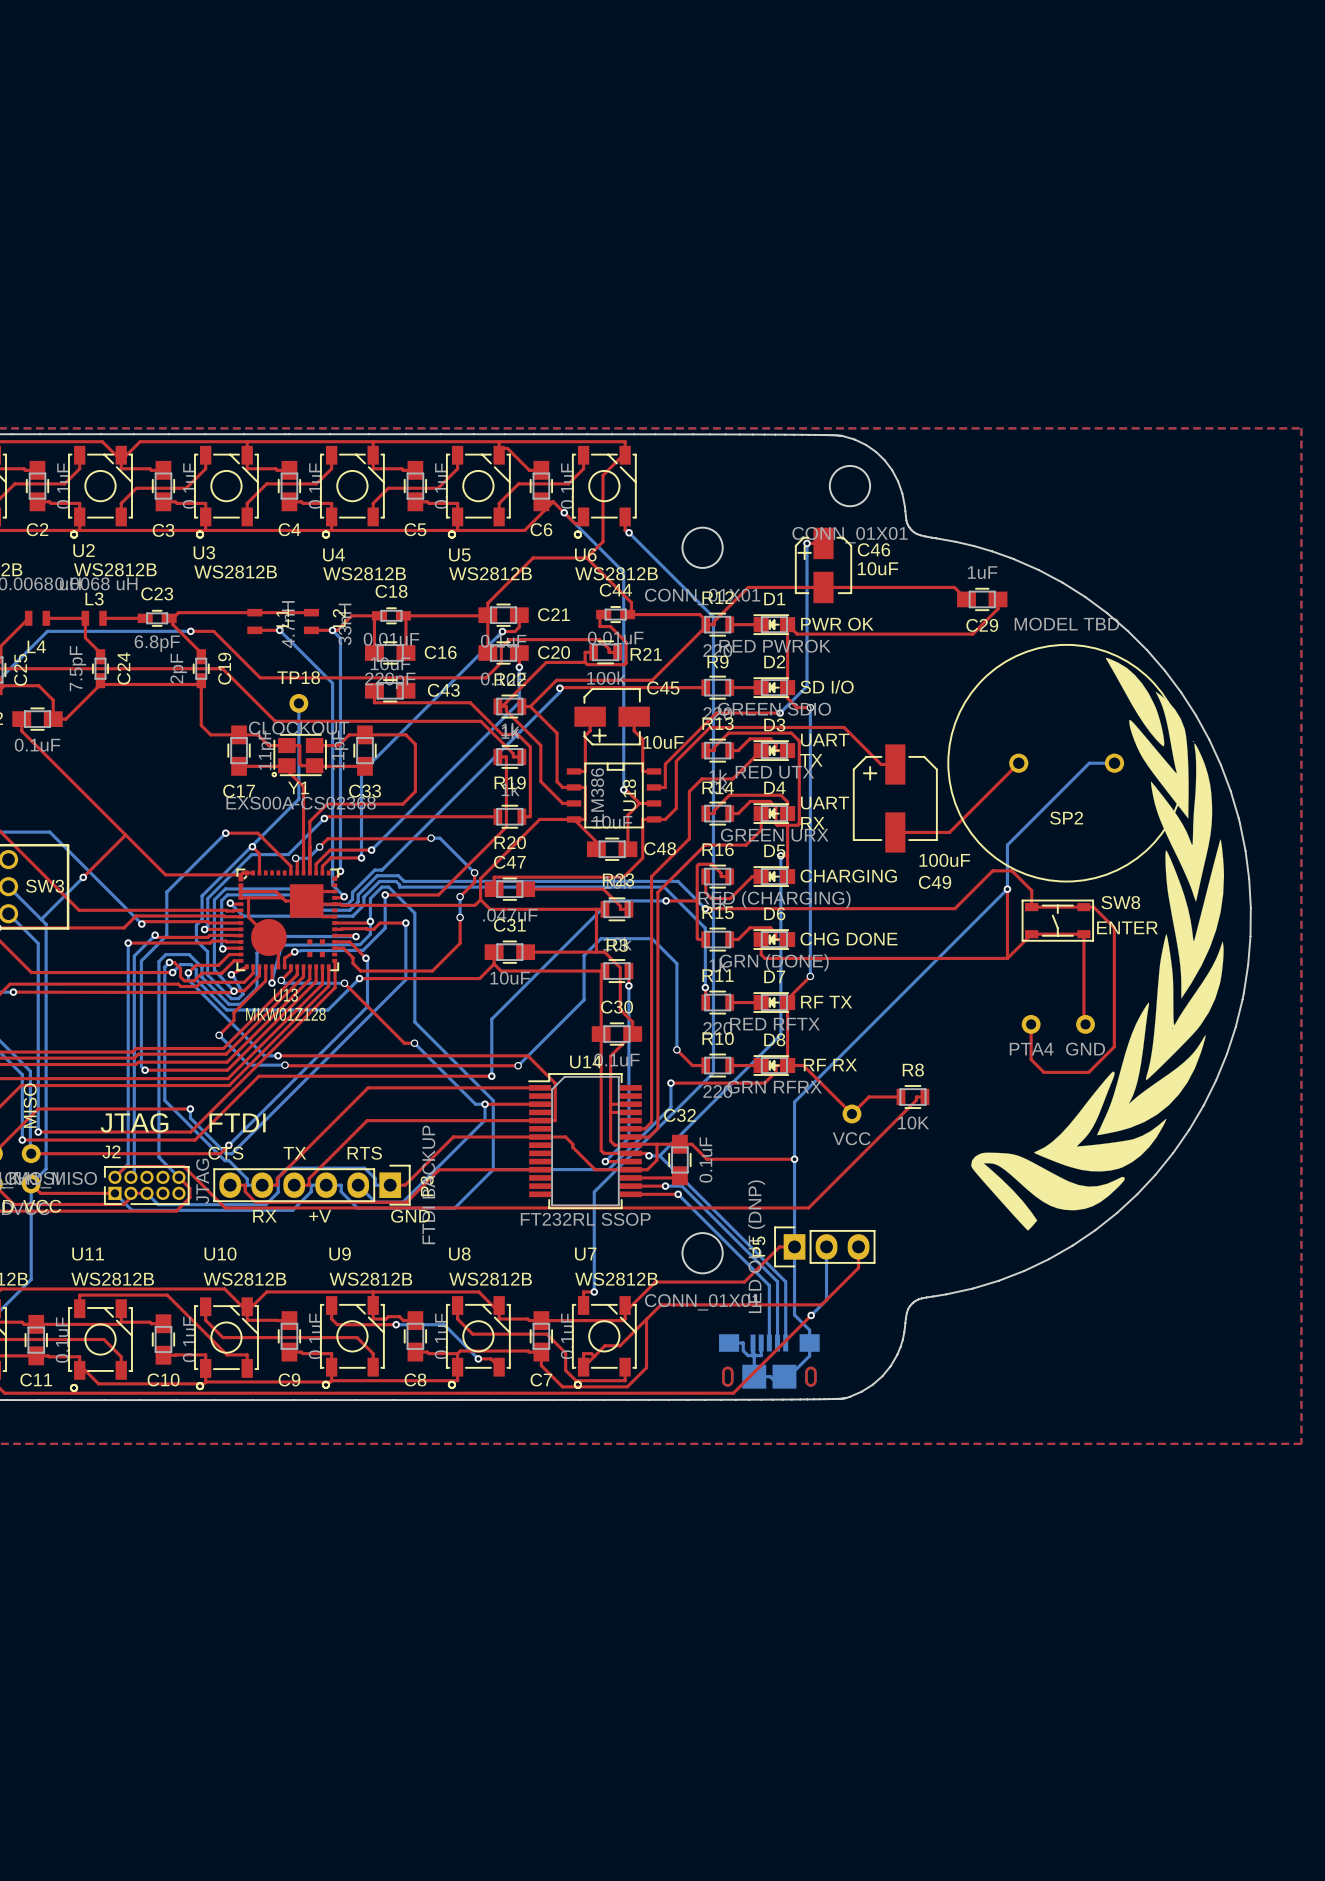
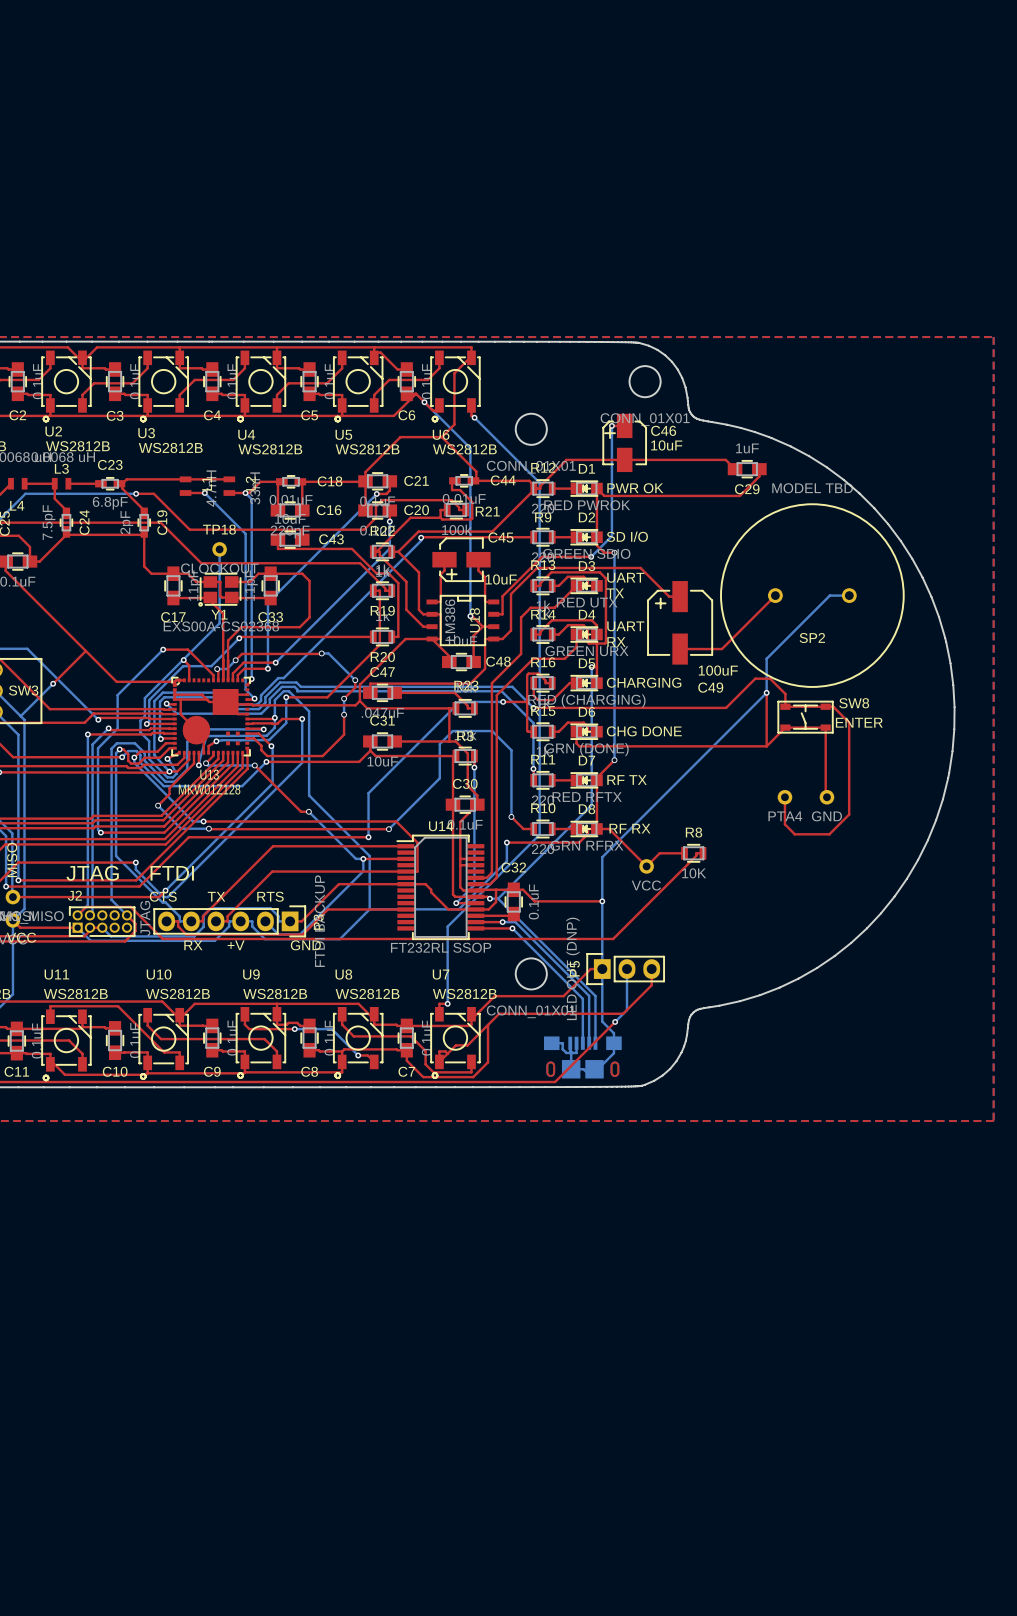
C44 name position: C44 (615, 590) -> C44 (503, 480)
C18 name position: C18 (391, 591) -> C18 (330, 481)
drawing: [971, 657, 1225, 1231] -> none

